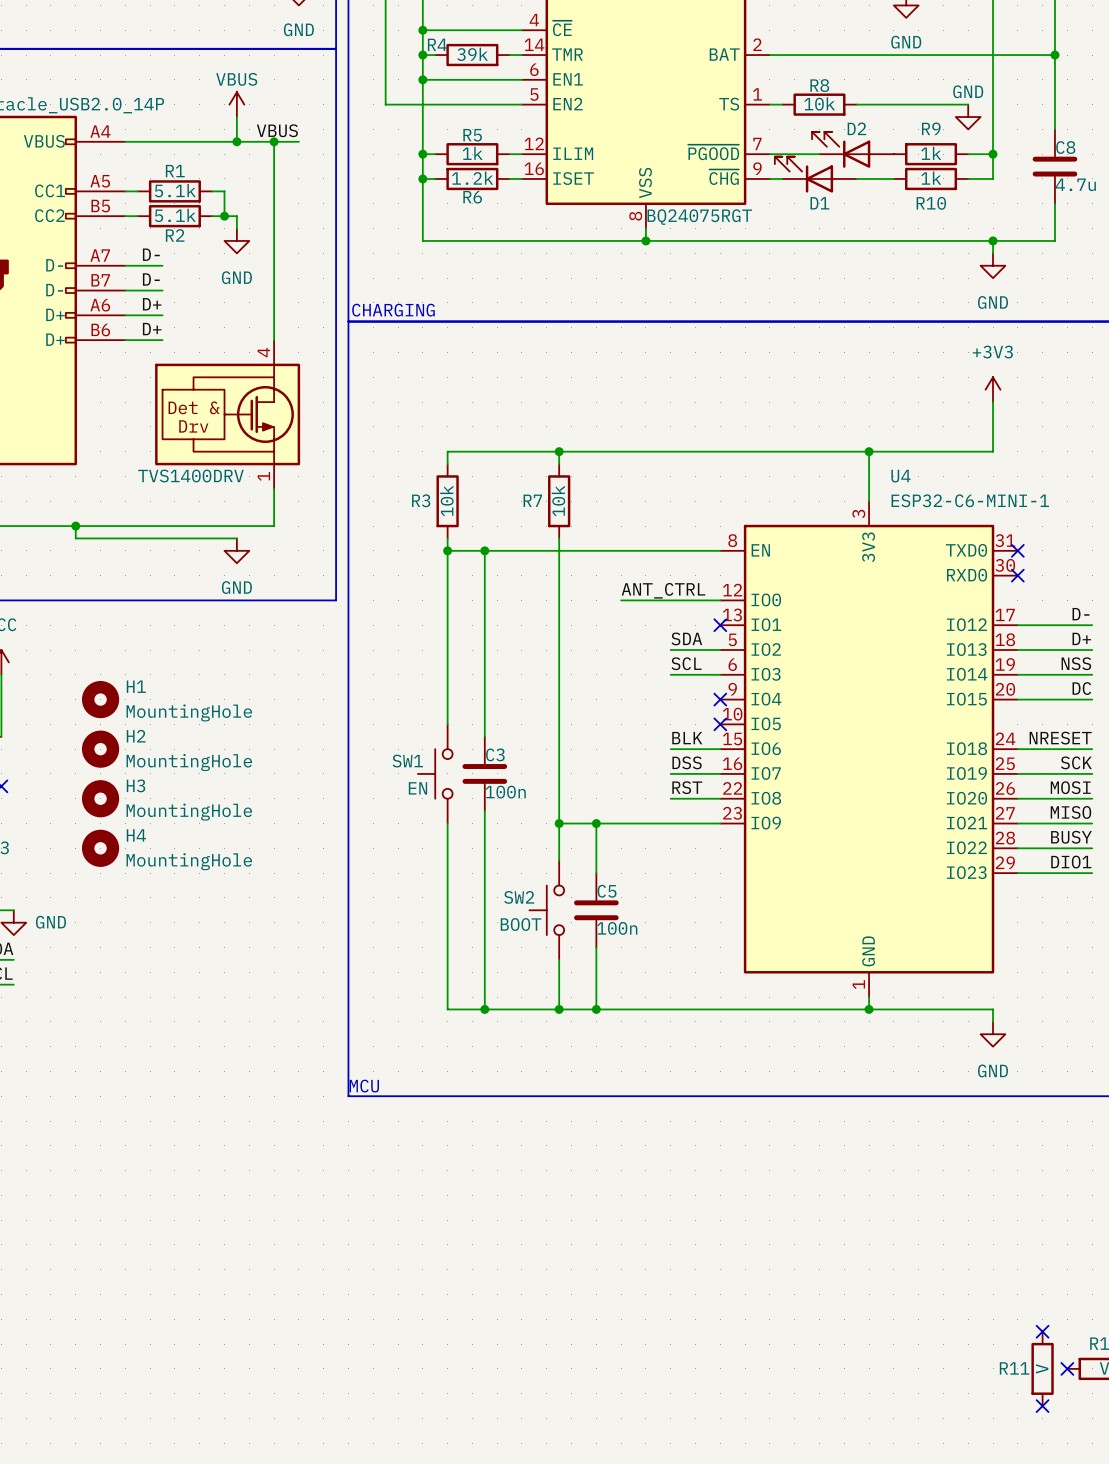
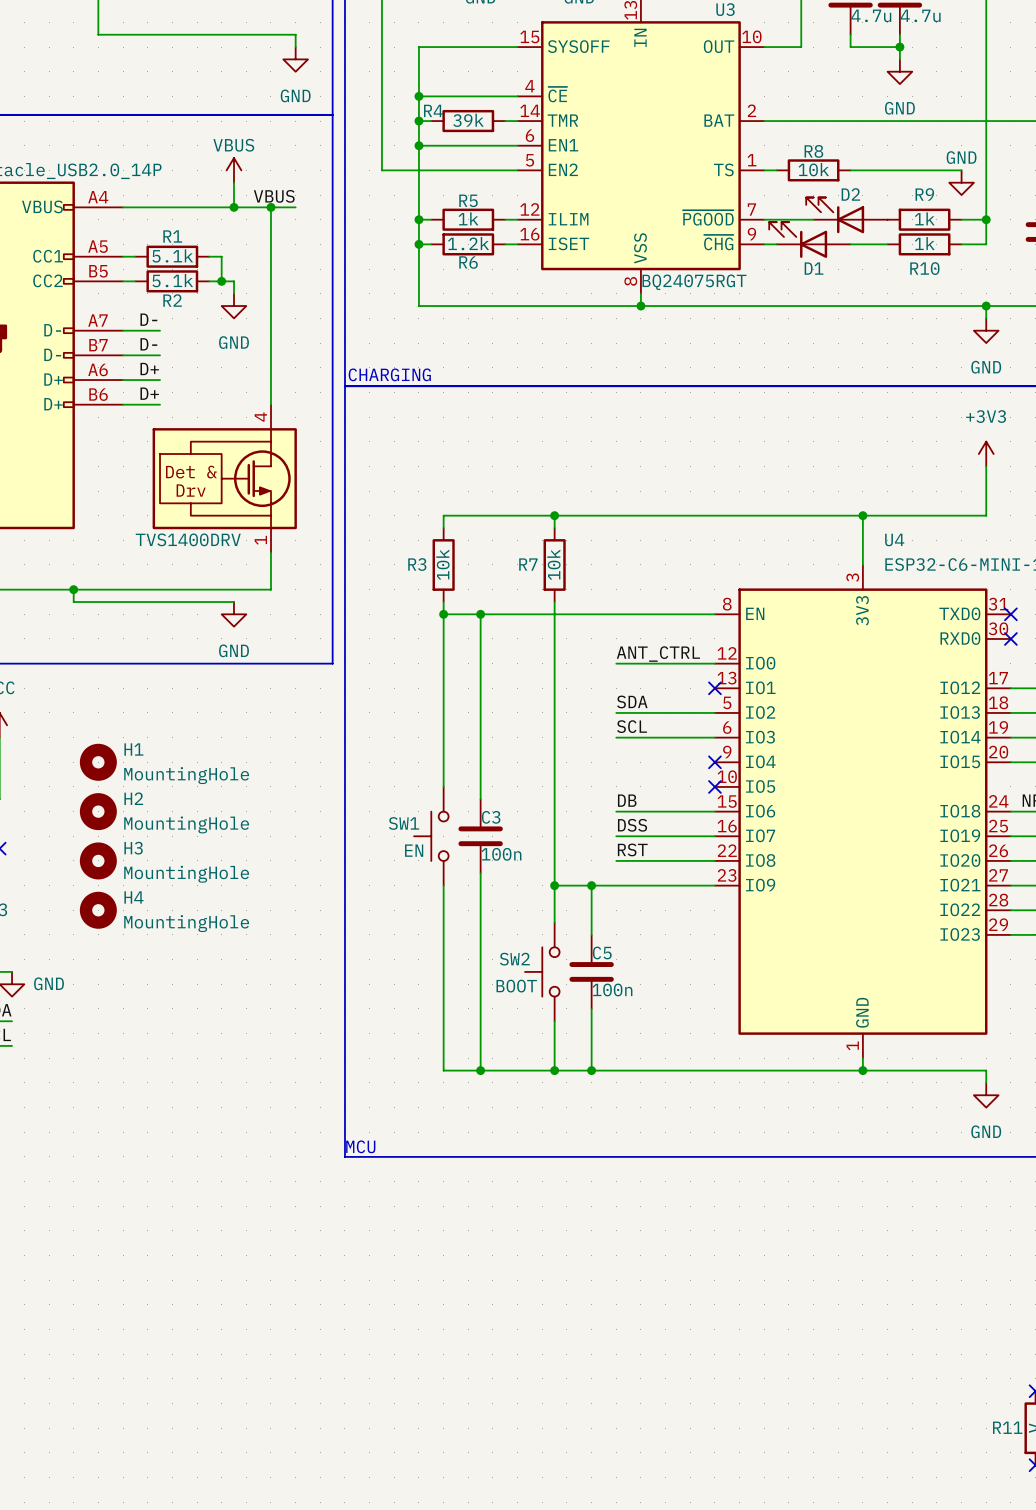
label position: SDA (686, 638) -> SDA (632, 701)
wire: none -> (616, 712) (665, 712)
label position: SCL (686, 663) -> SCL (632, 726)
wire: none -> (616, 737) (665, 737)
label: none -> DB (627, 800)
label: BLK (687, 738) -> none
wire: none -> (616, 811) (665, 811)
label position: DSS (687, 762) -> DSS (632, 825)
wire: none -> (616, 836) (665, 836)
label position: RST (687, 787) -> RST (632, 849)
wire: none -> (616, 860) (665, 860)

